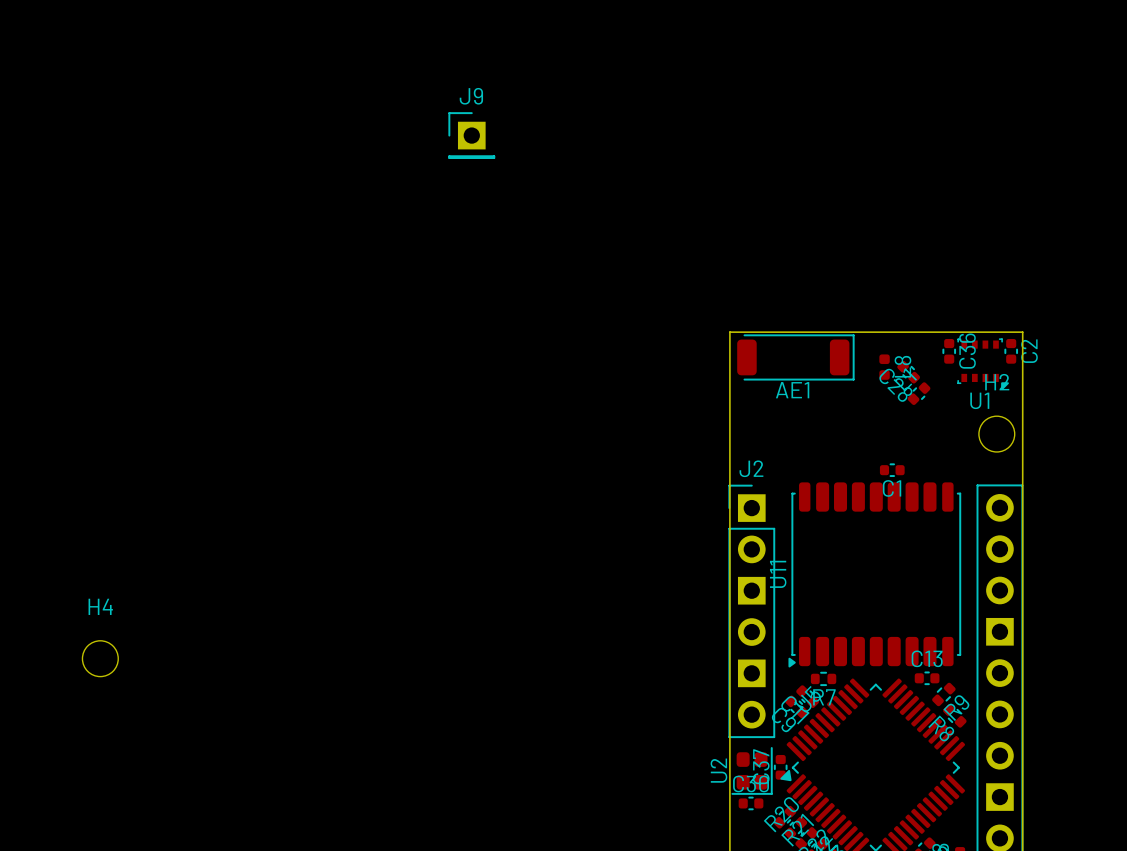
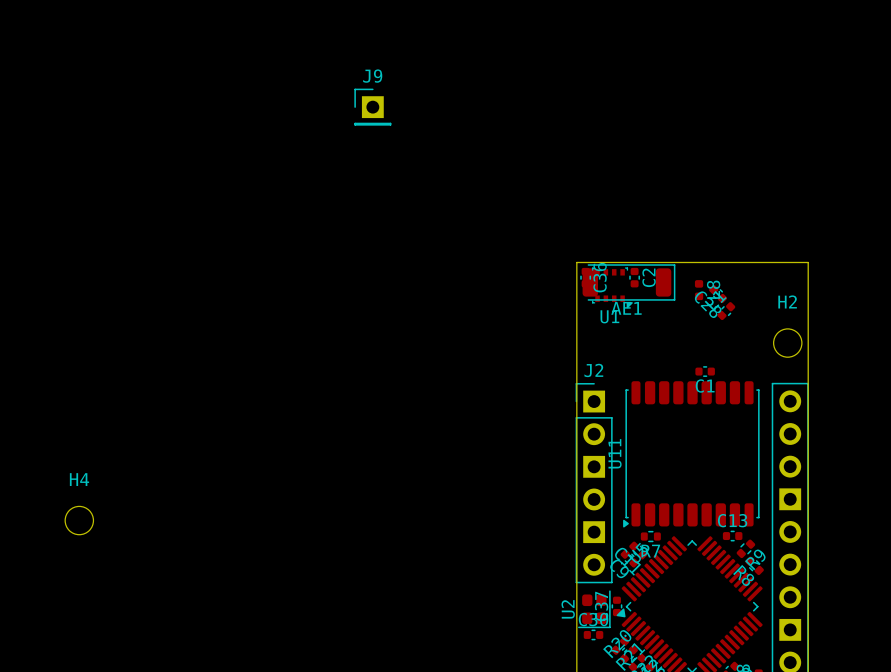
C36 position: (949, 351) -> (585, 277)
C2 position: (1011, 351) -> (634, 277)
U1 position: (983, 364) -> (612, 287)

